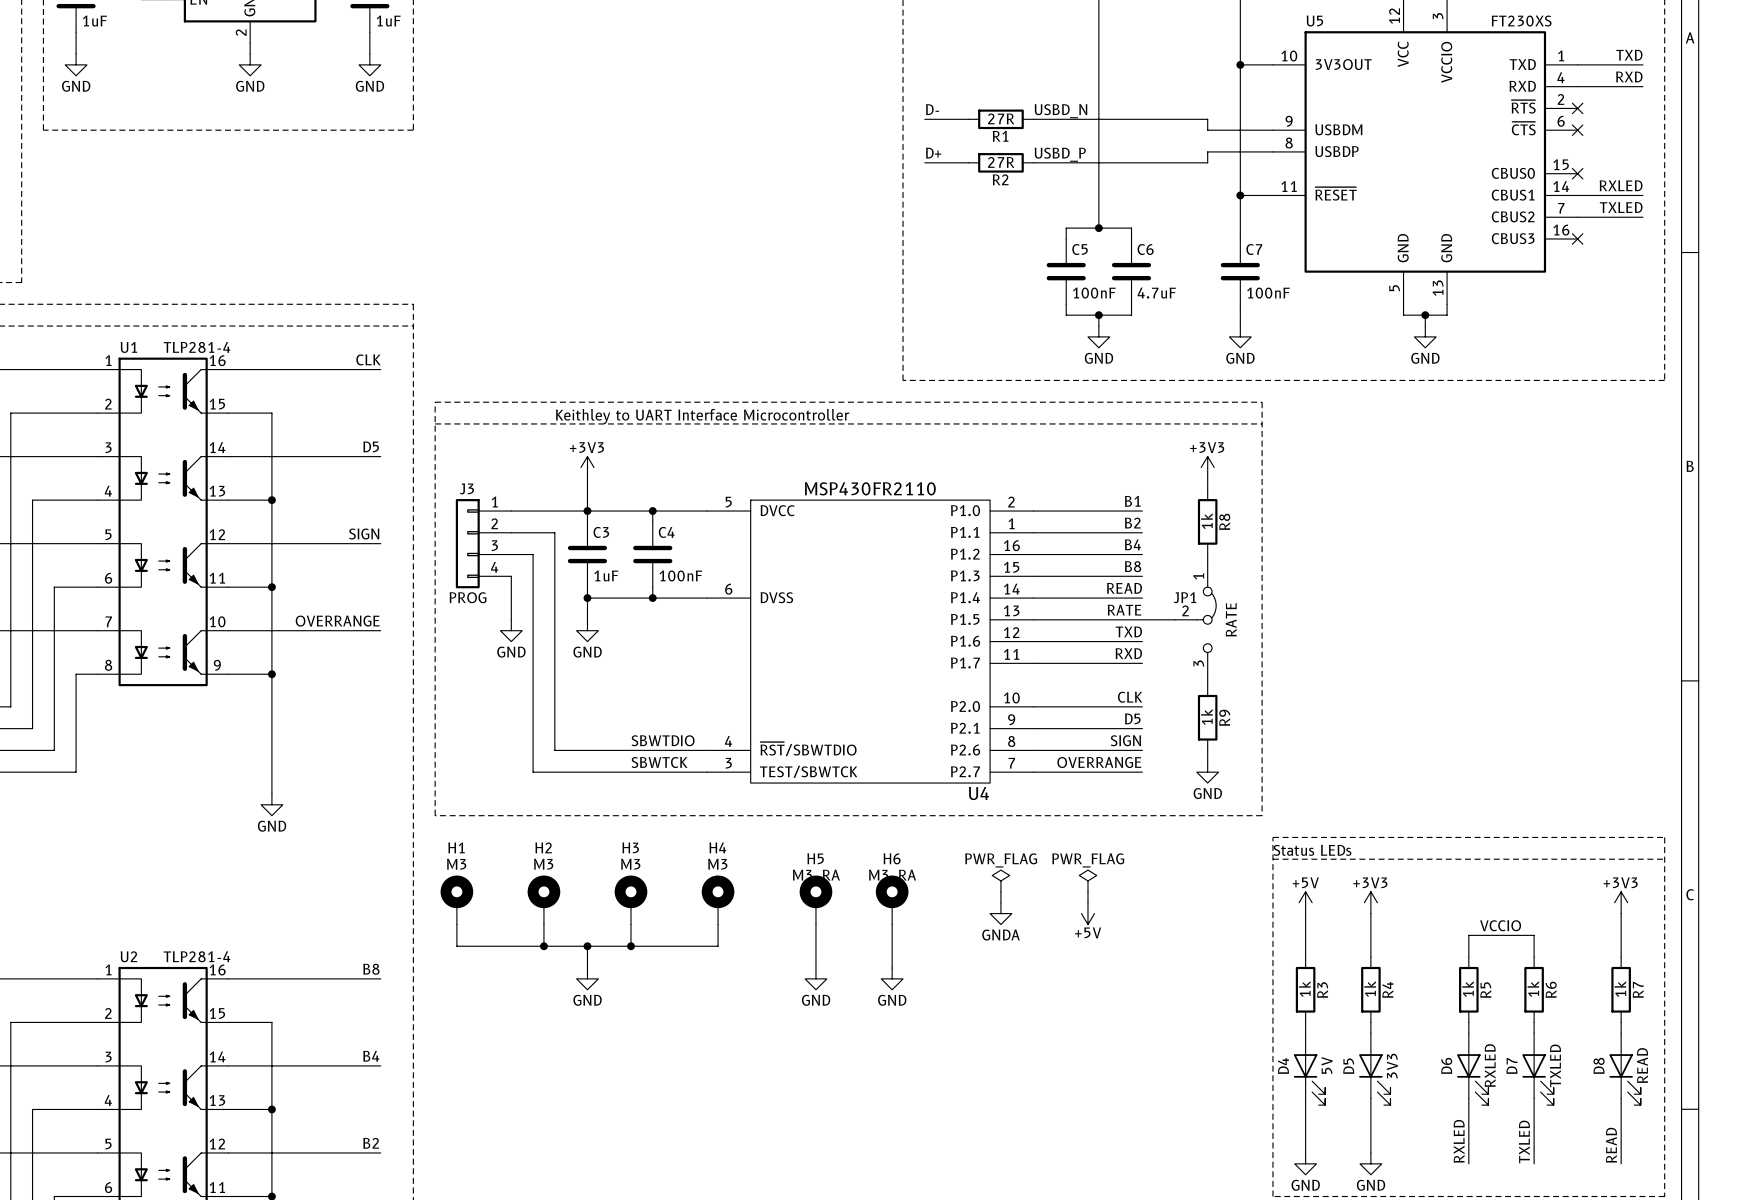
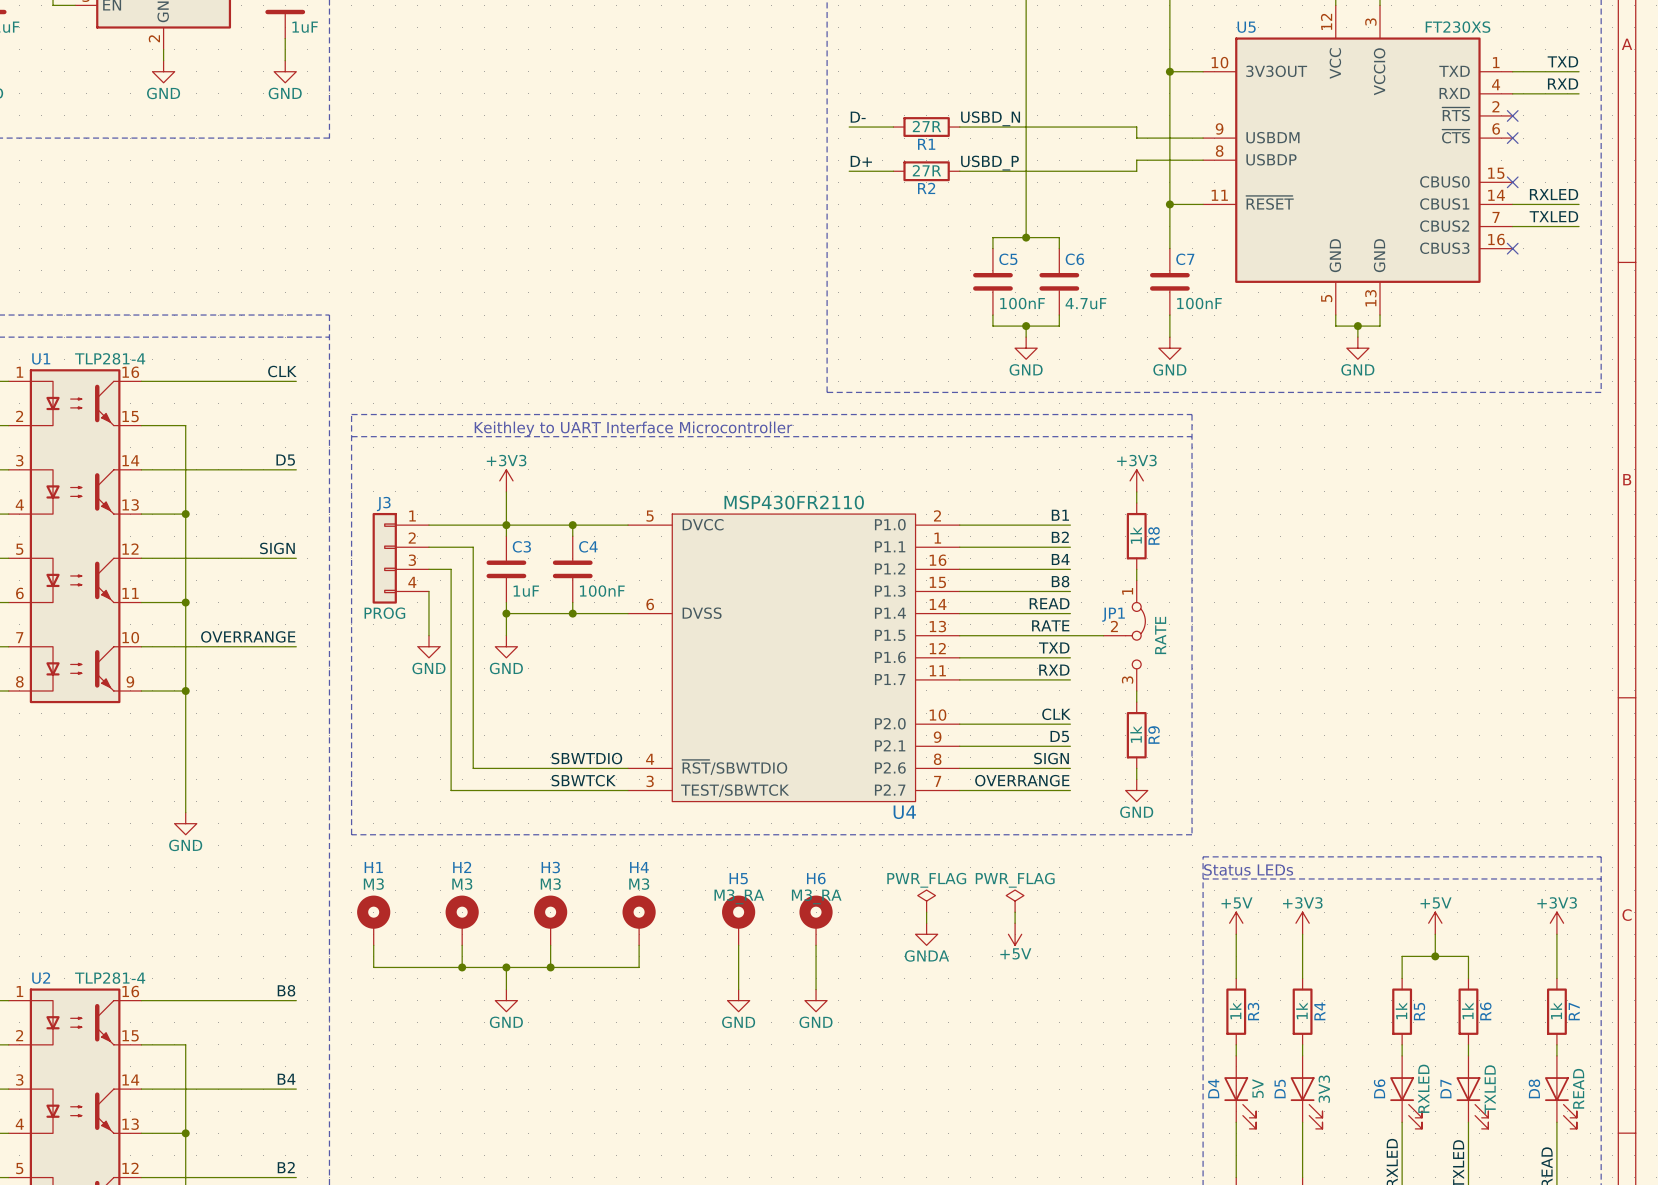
power symbol: none -> +5V (1435, 923)
wire: none -> (1435, 934) (1435, 956)
label: VCCIO (1500, 925) -> none
junction: none -> (1435, 956)

